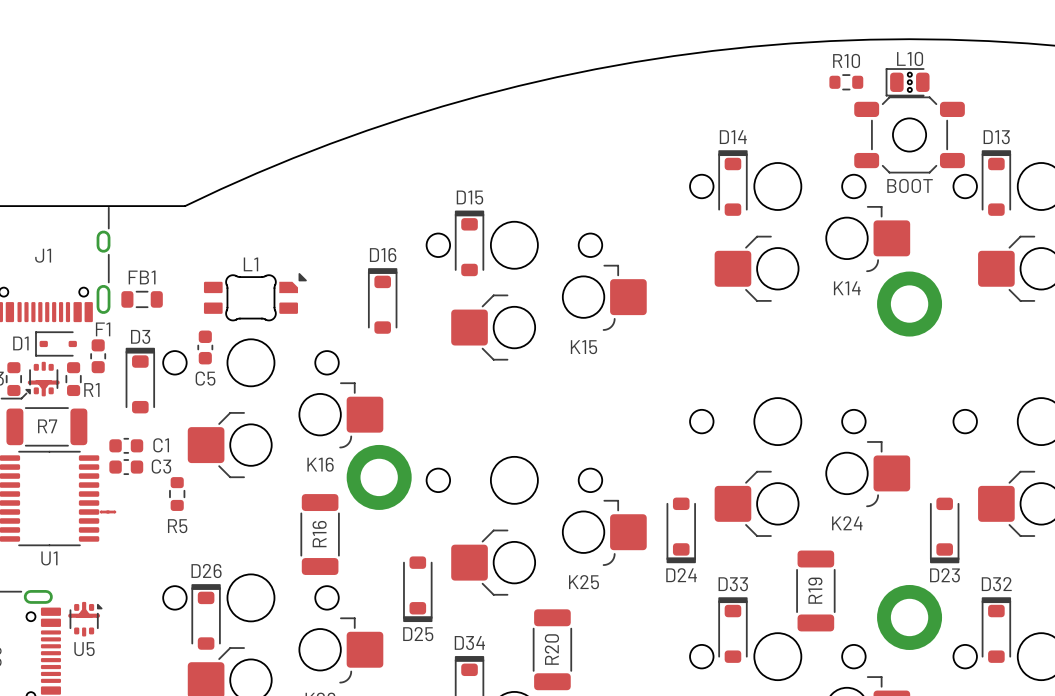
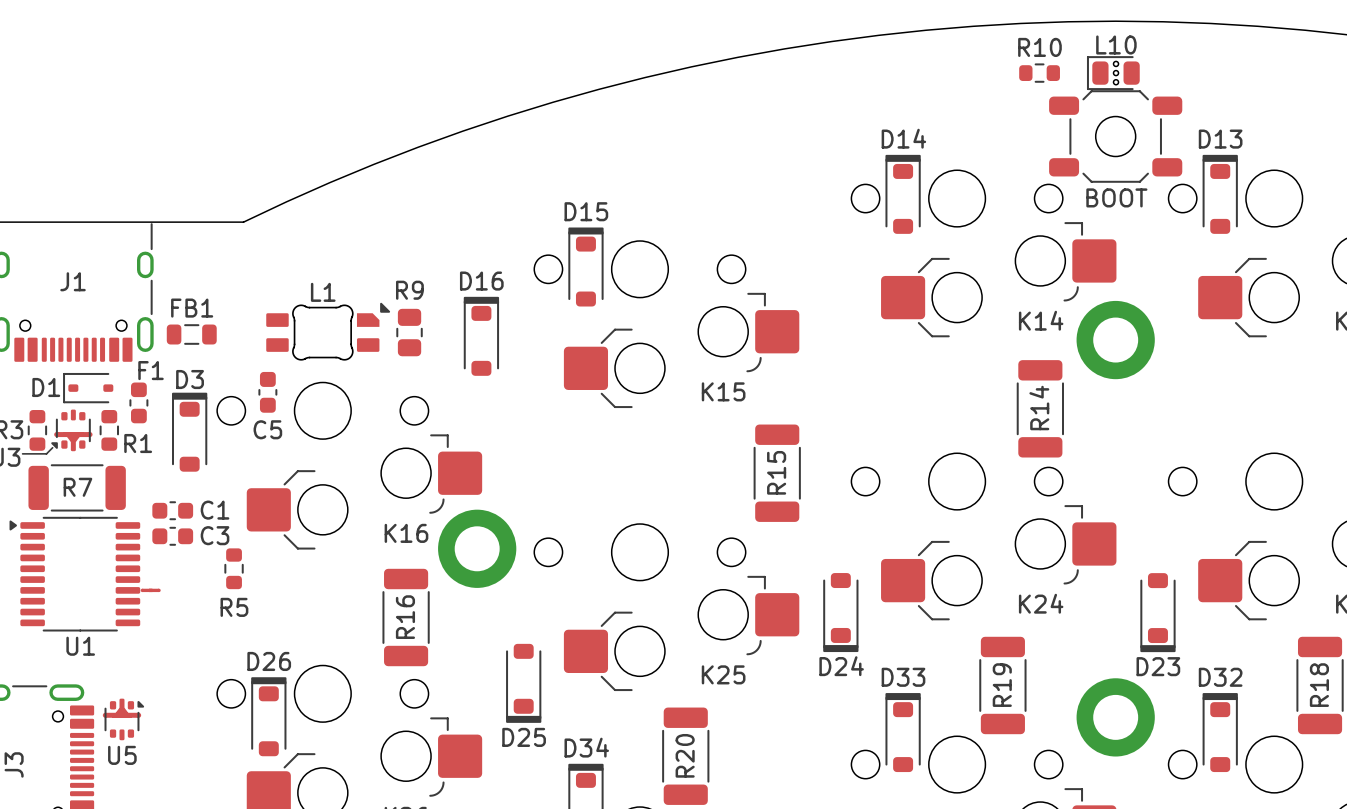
R9: none -> (409, 332)
R14: none -> (1040, 408)
R15: none -> (777, 473)

